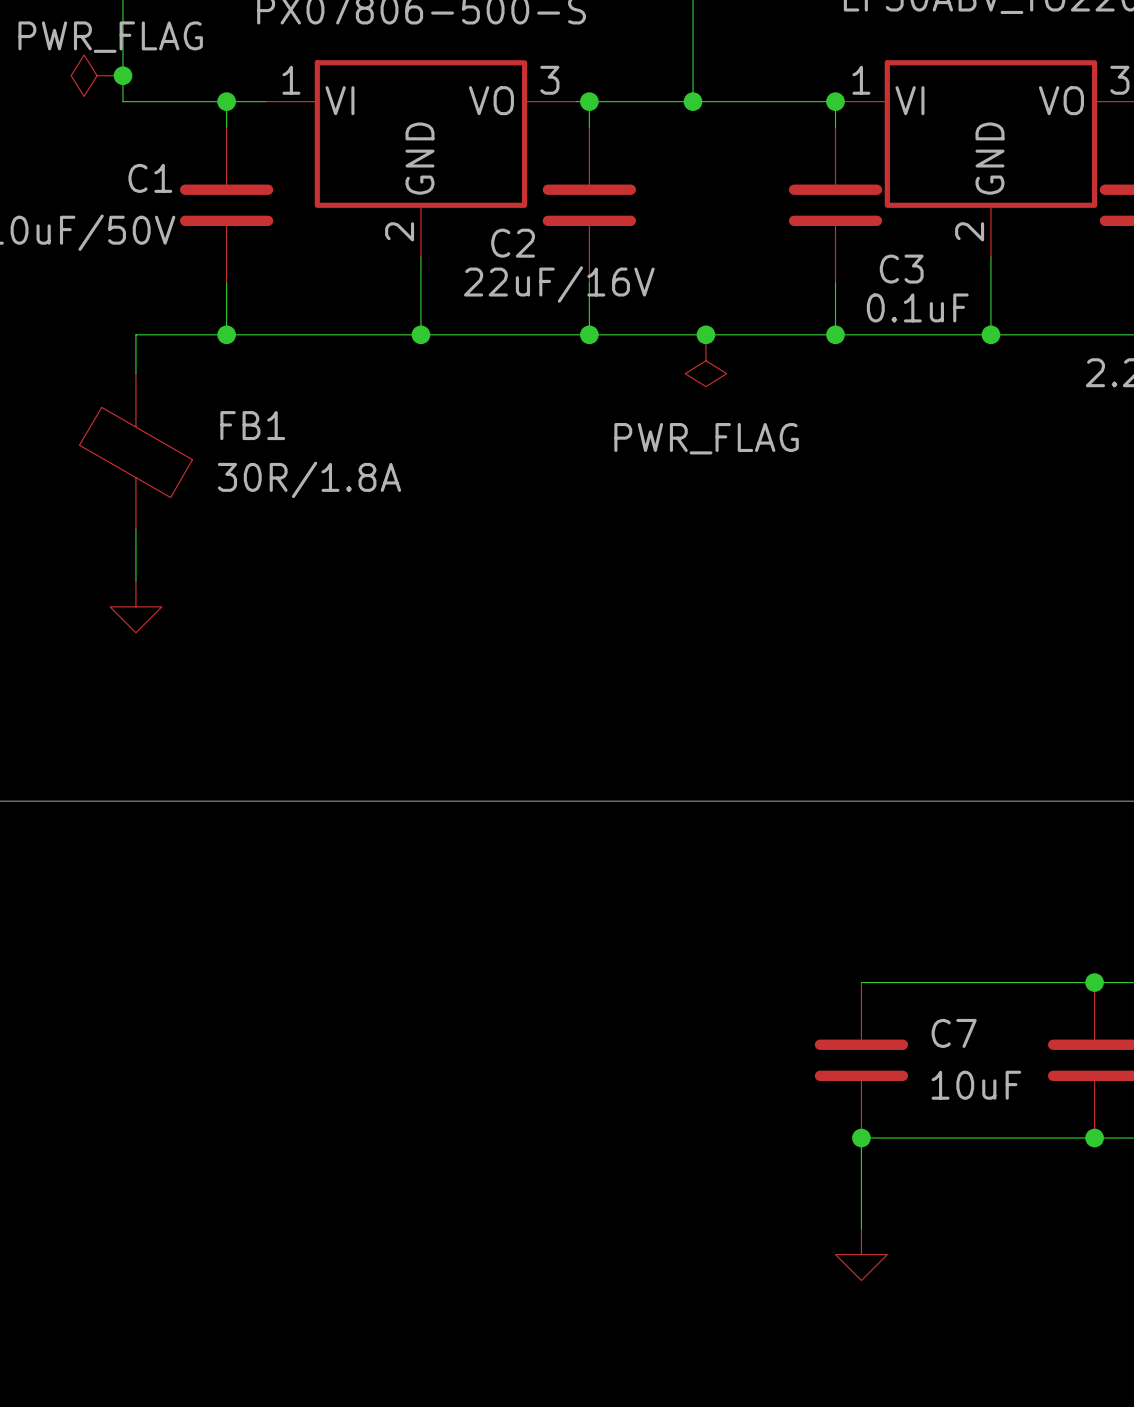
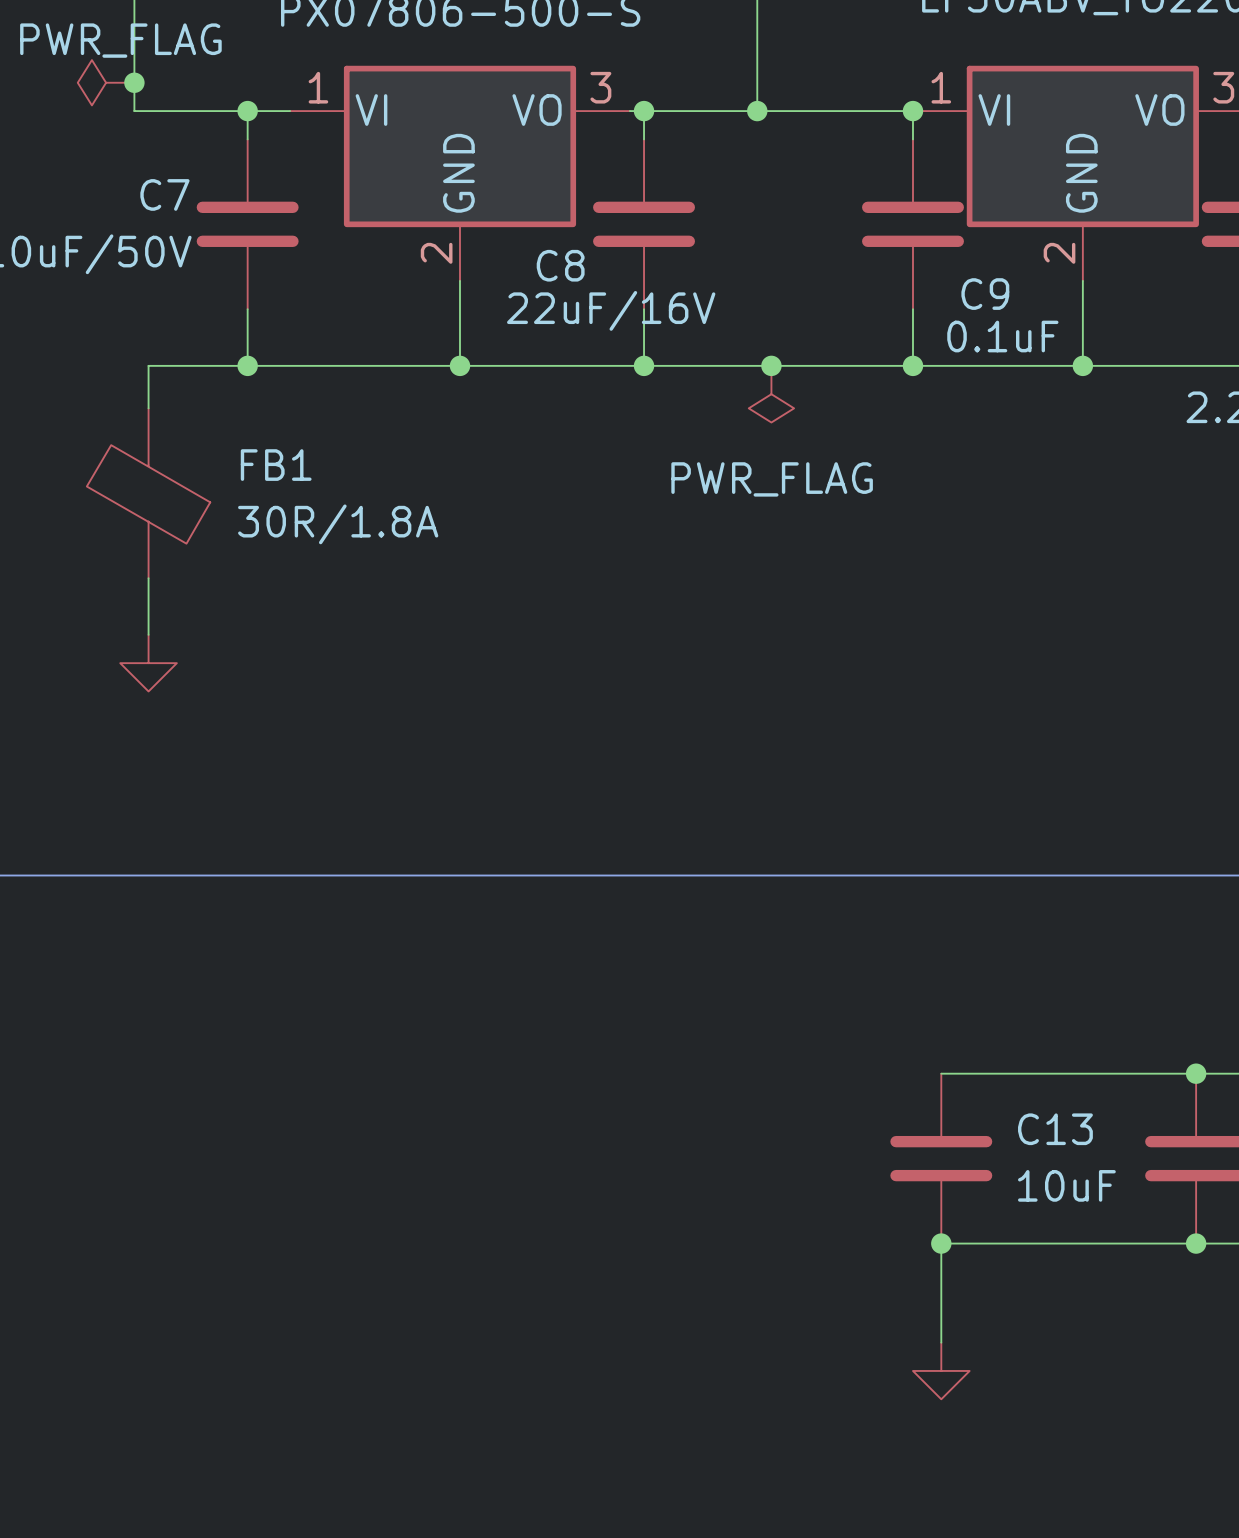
C1 name: C1 (150, 178) -> C7 (164, 194)
C2 name: C2 (513, 243) -> C8 (560, 265)
C3 name: C3 (901, 269) -> C9 (985, 294)
C7 name: C7 (954, 1033) -> C13 (1055, 1129)

